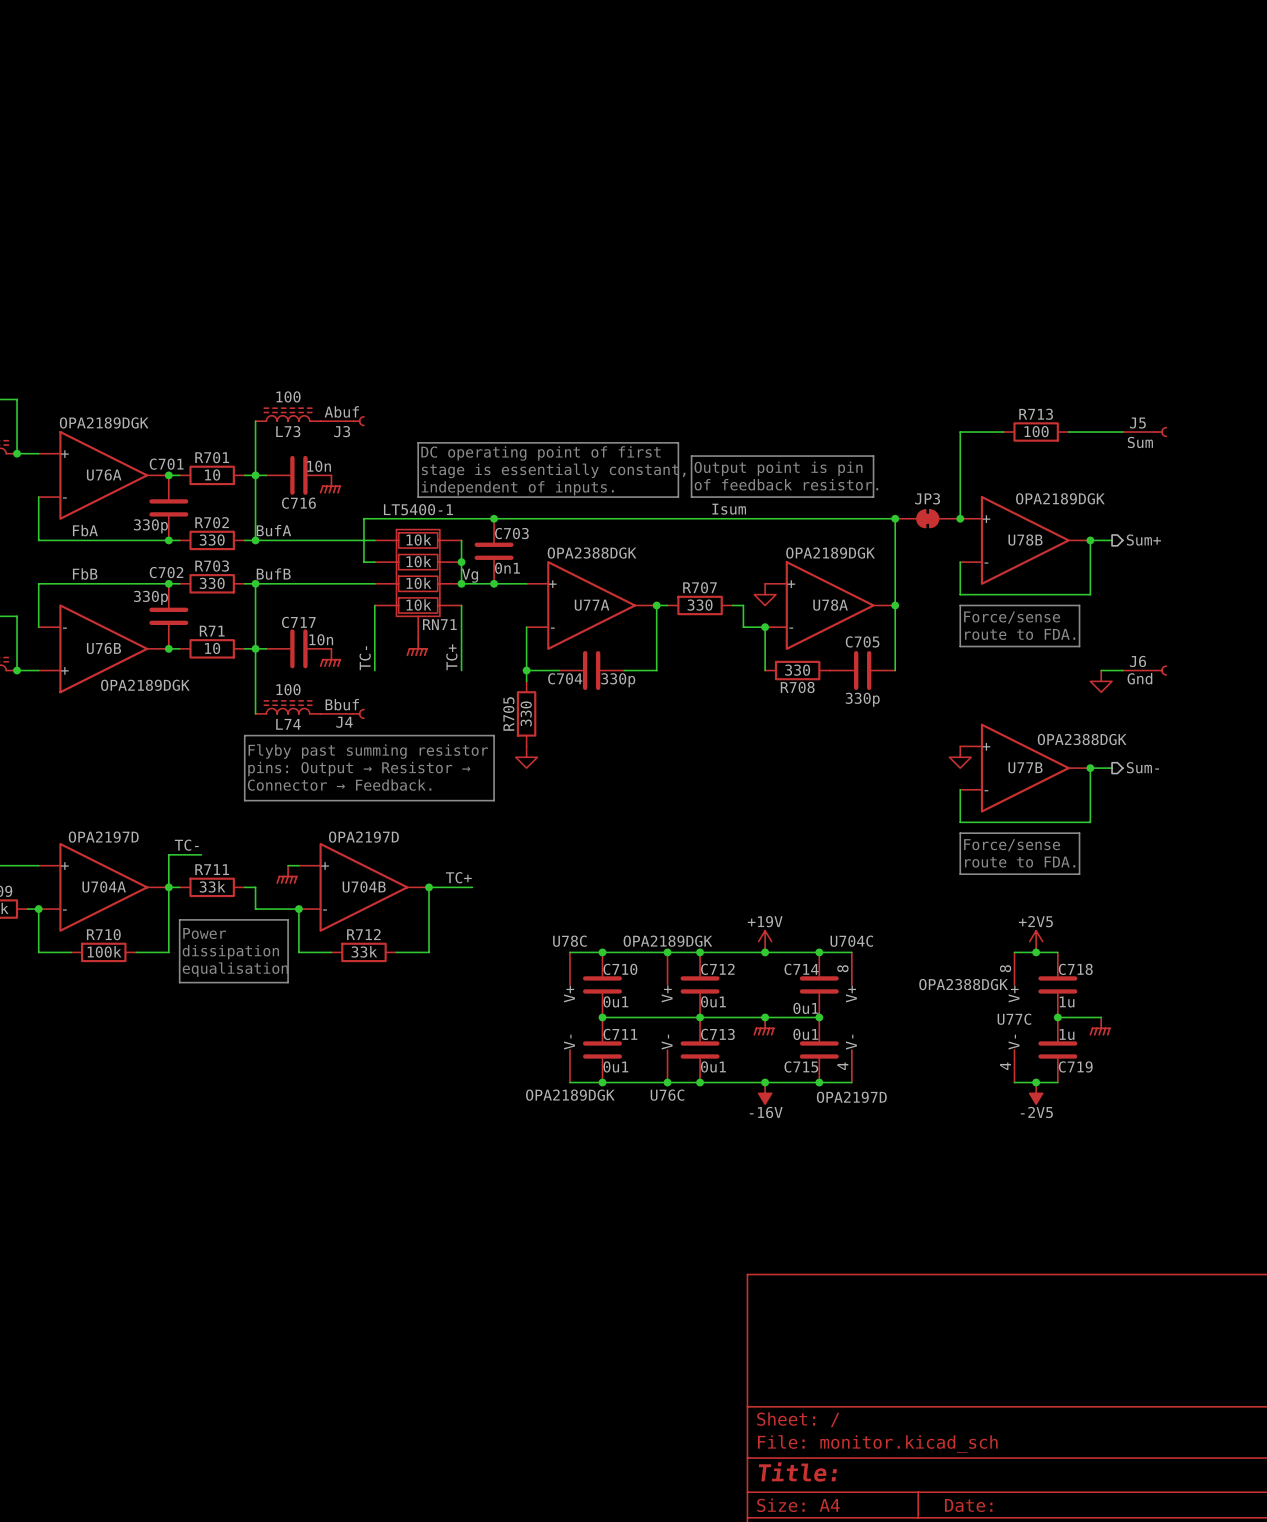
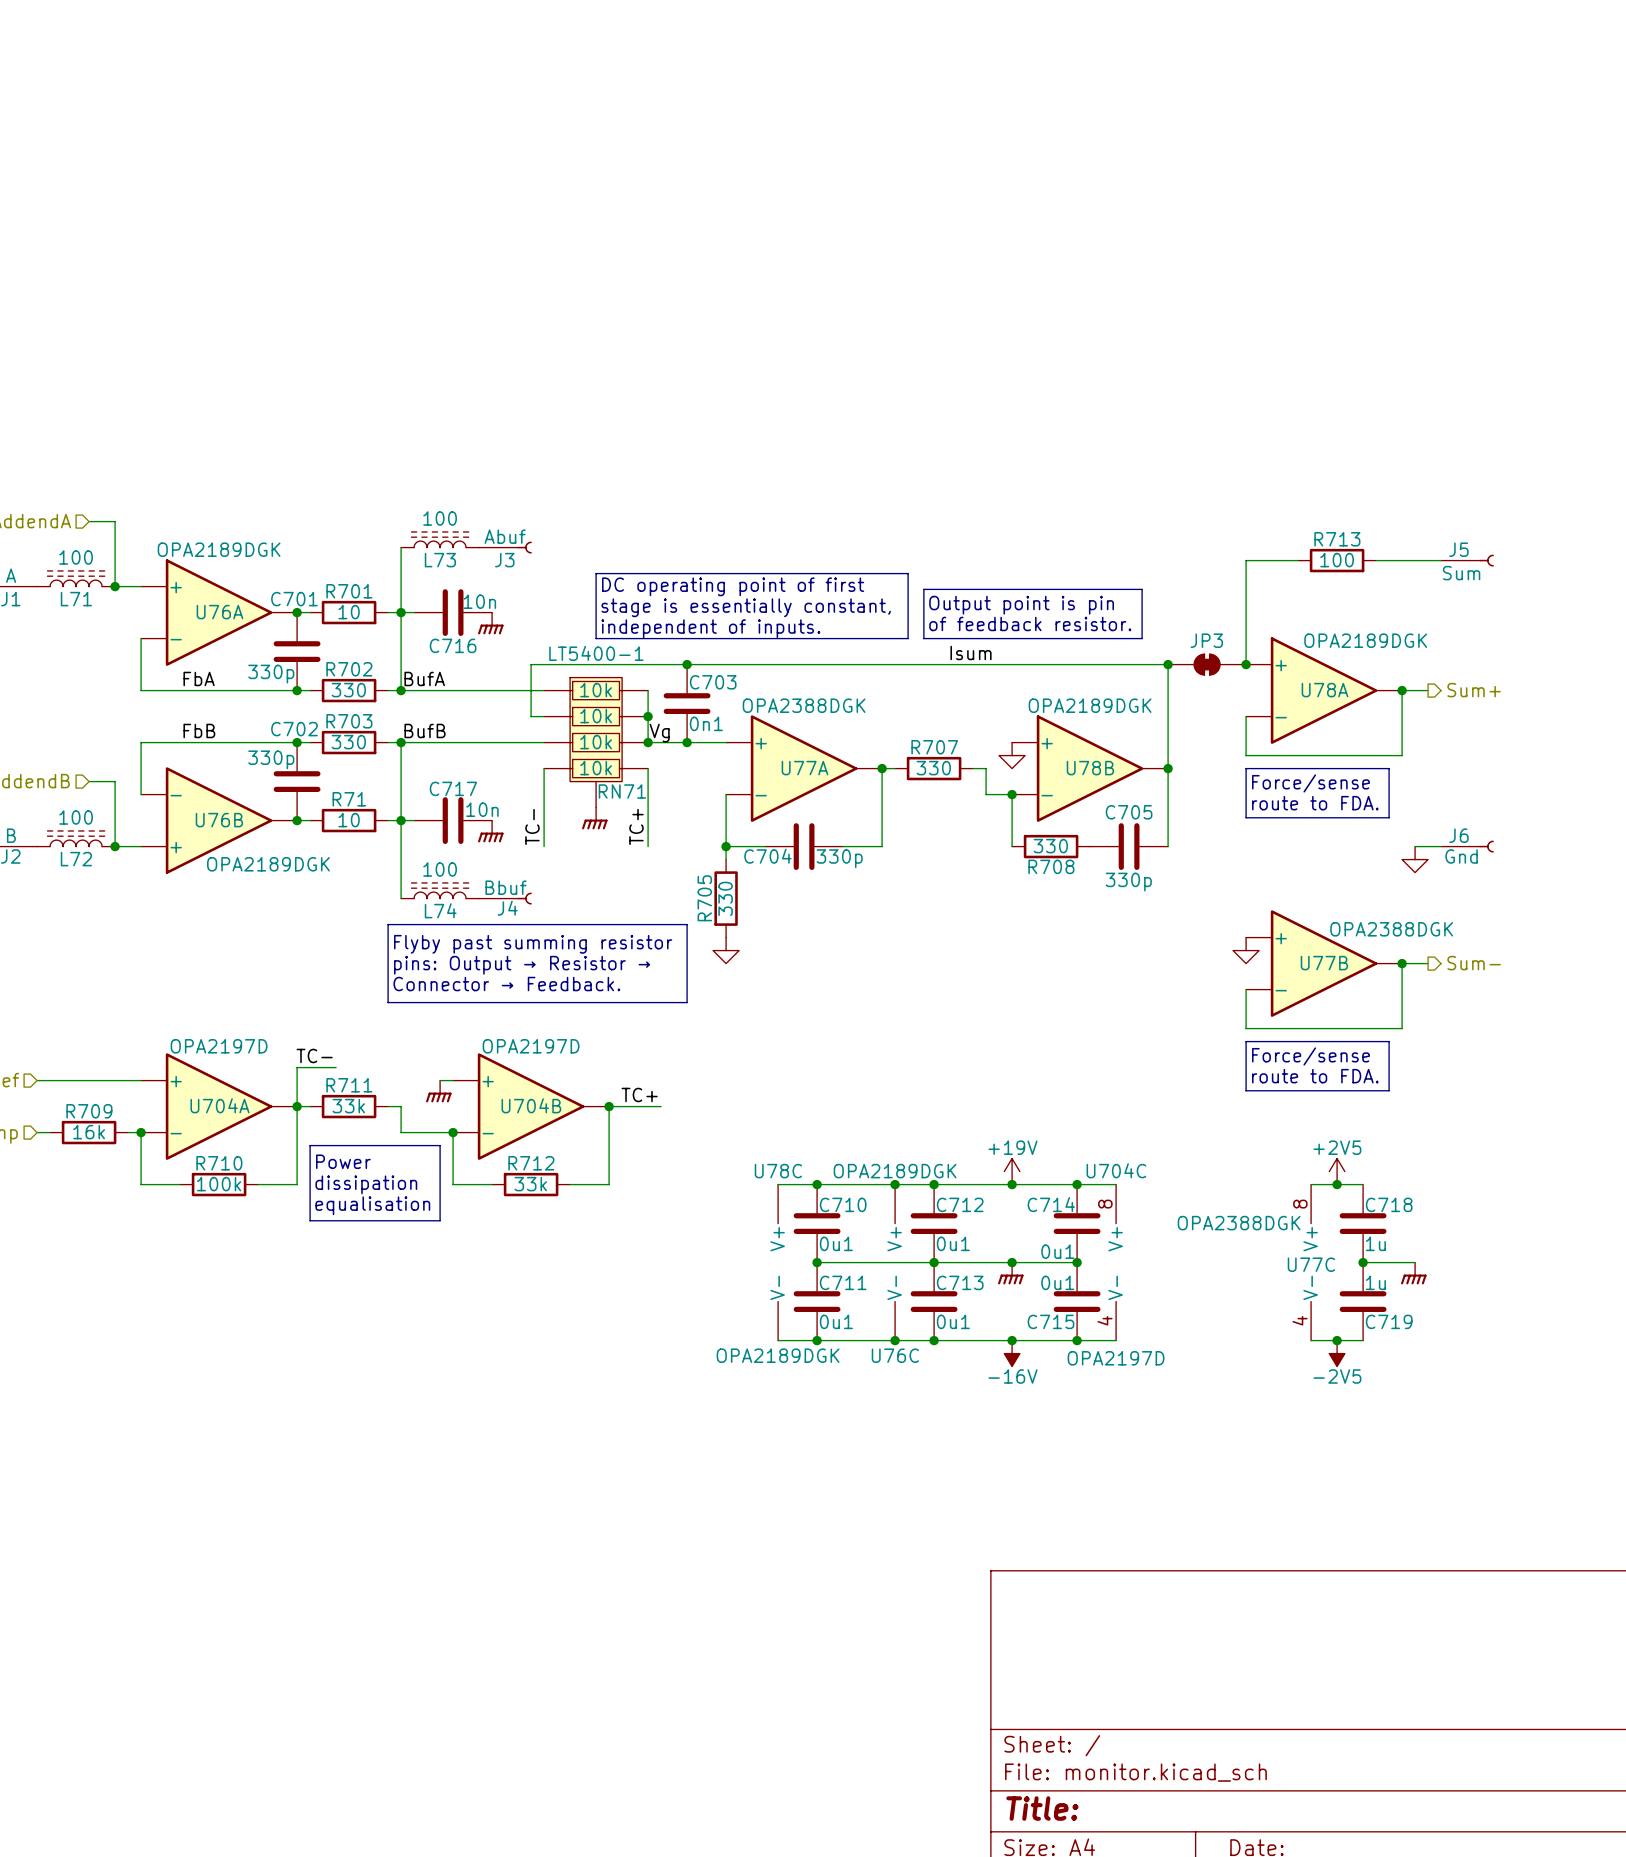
U78B name: U78B (1025, 540) -> U78A (1325, 690)
U78A name: U78A (830, 605) -> U78B (1090, 768)

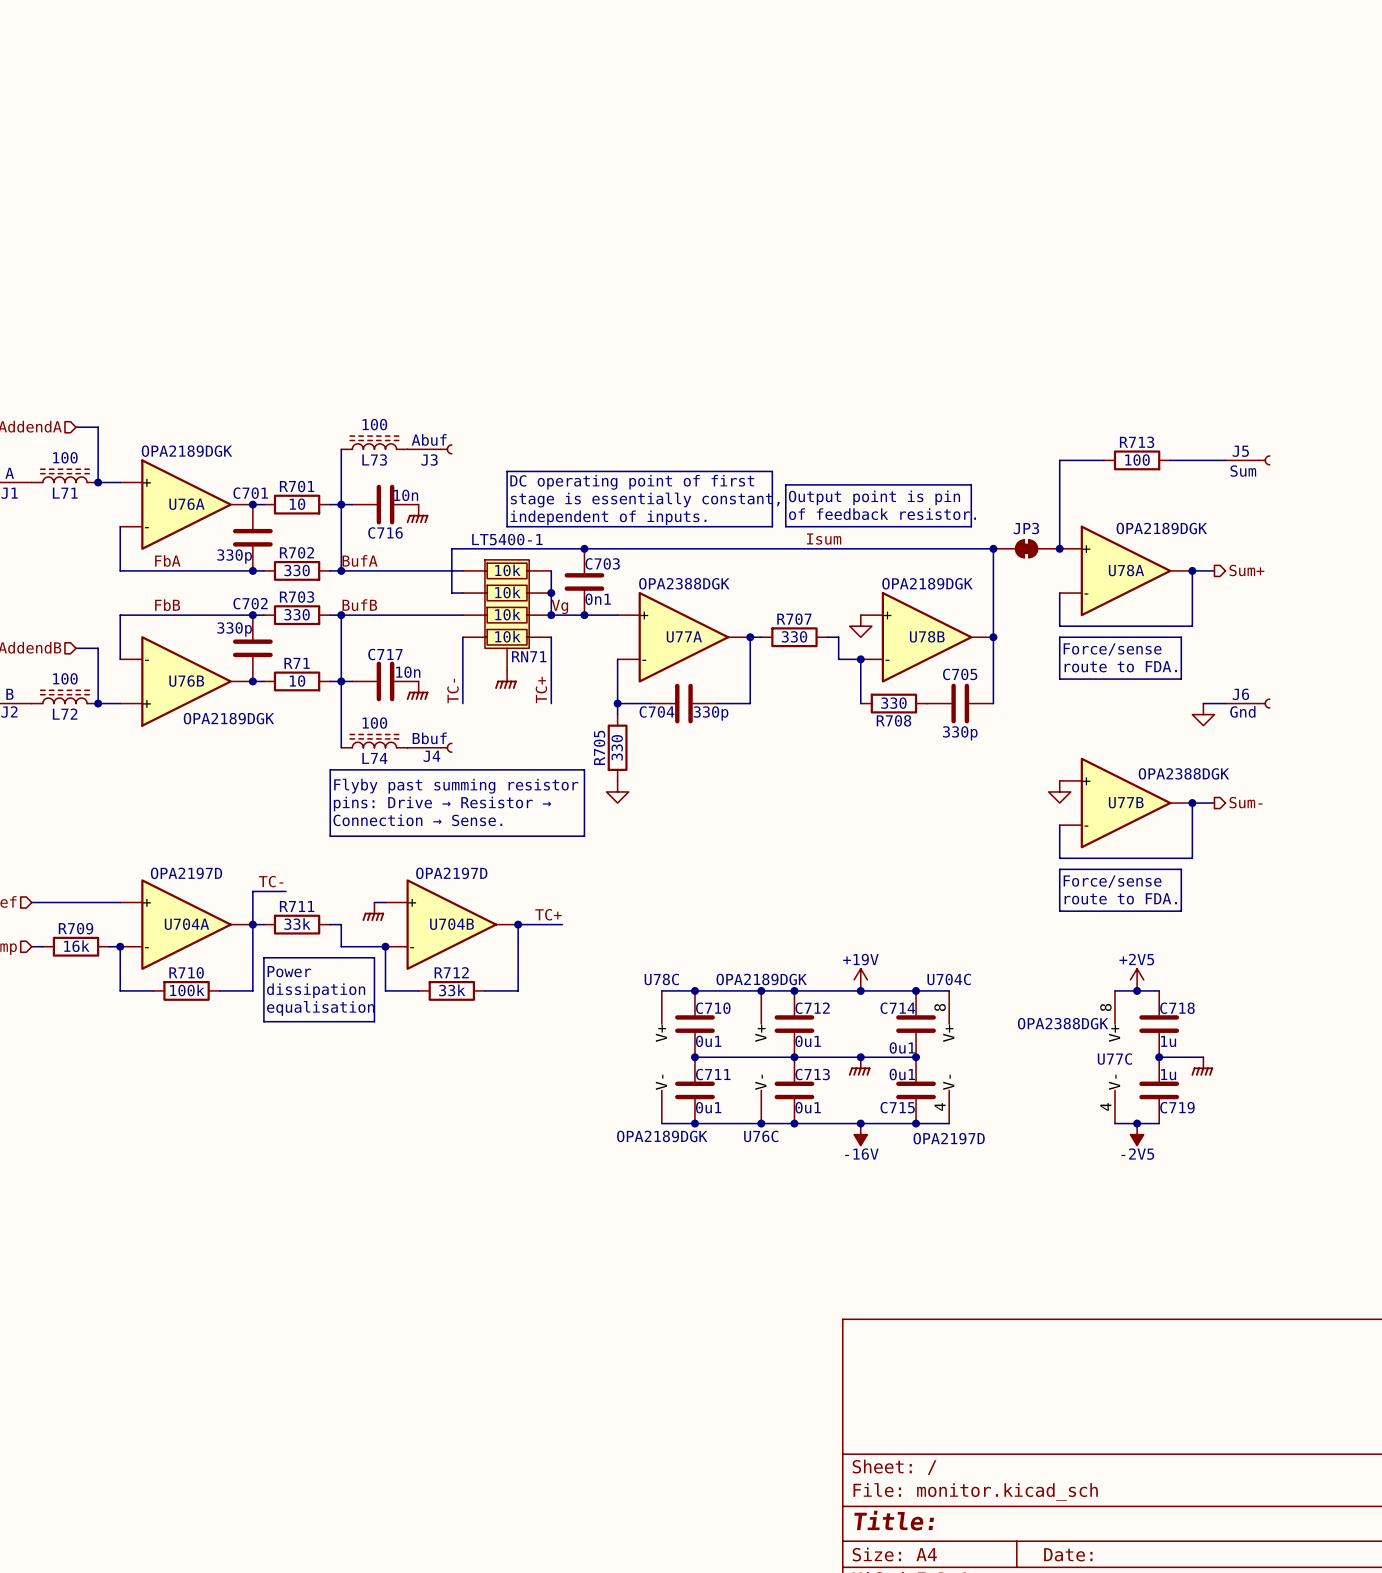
text: pins: Output → Resistor → (522, 965) -> pins: Drive → Resistor → (442, 803)
text: Connector → Feedback. (506, 984) -> Connection → Sense. (417, 820)

